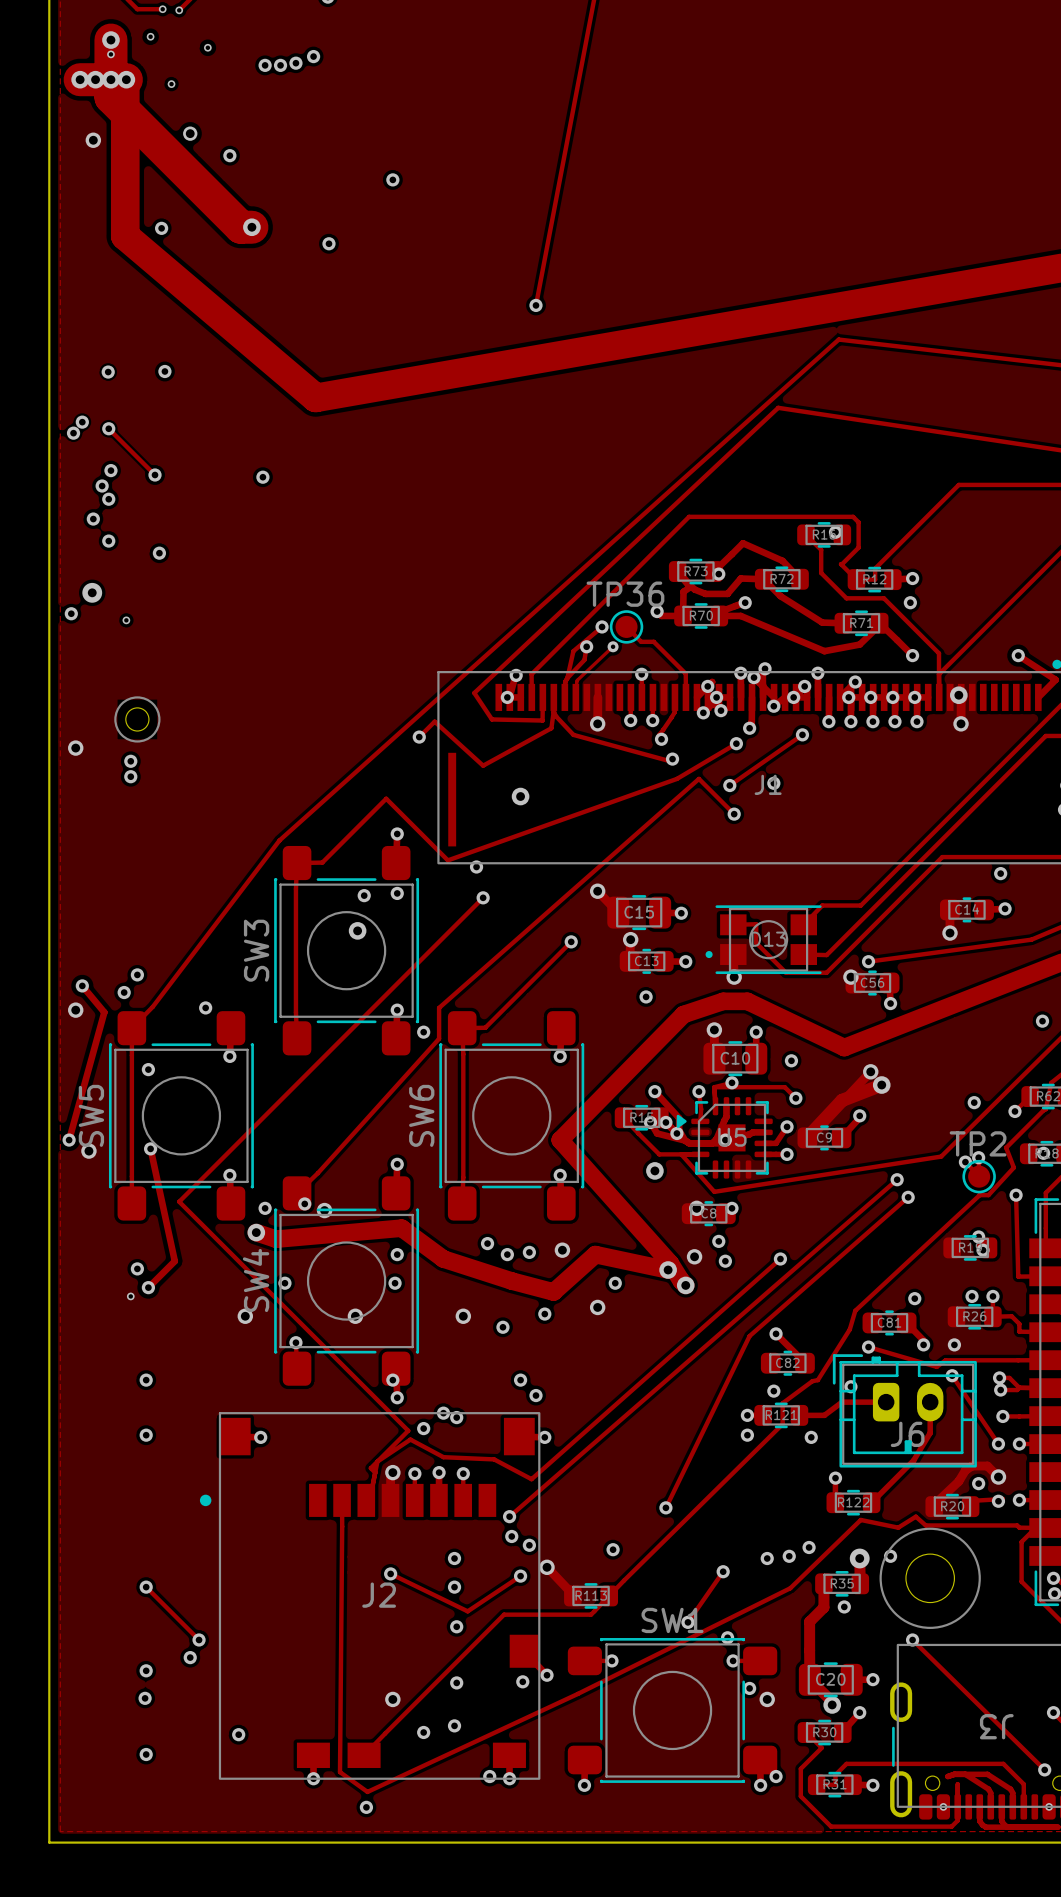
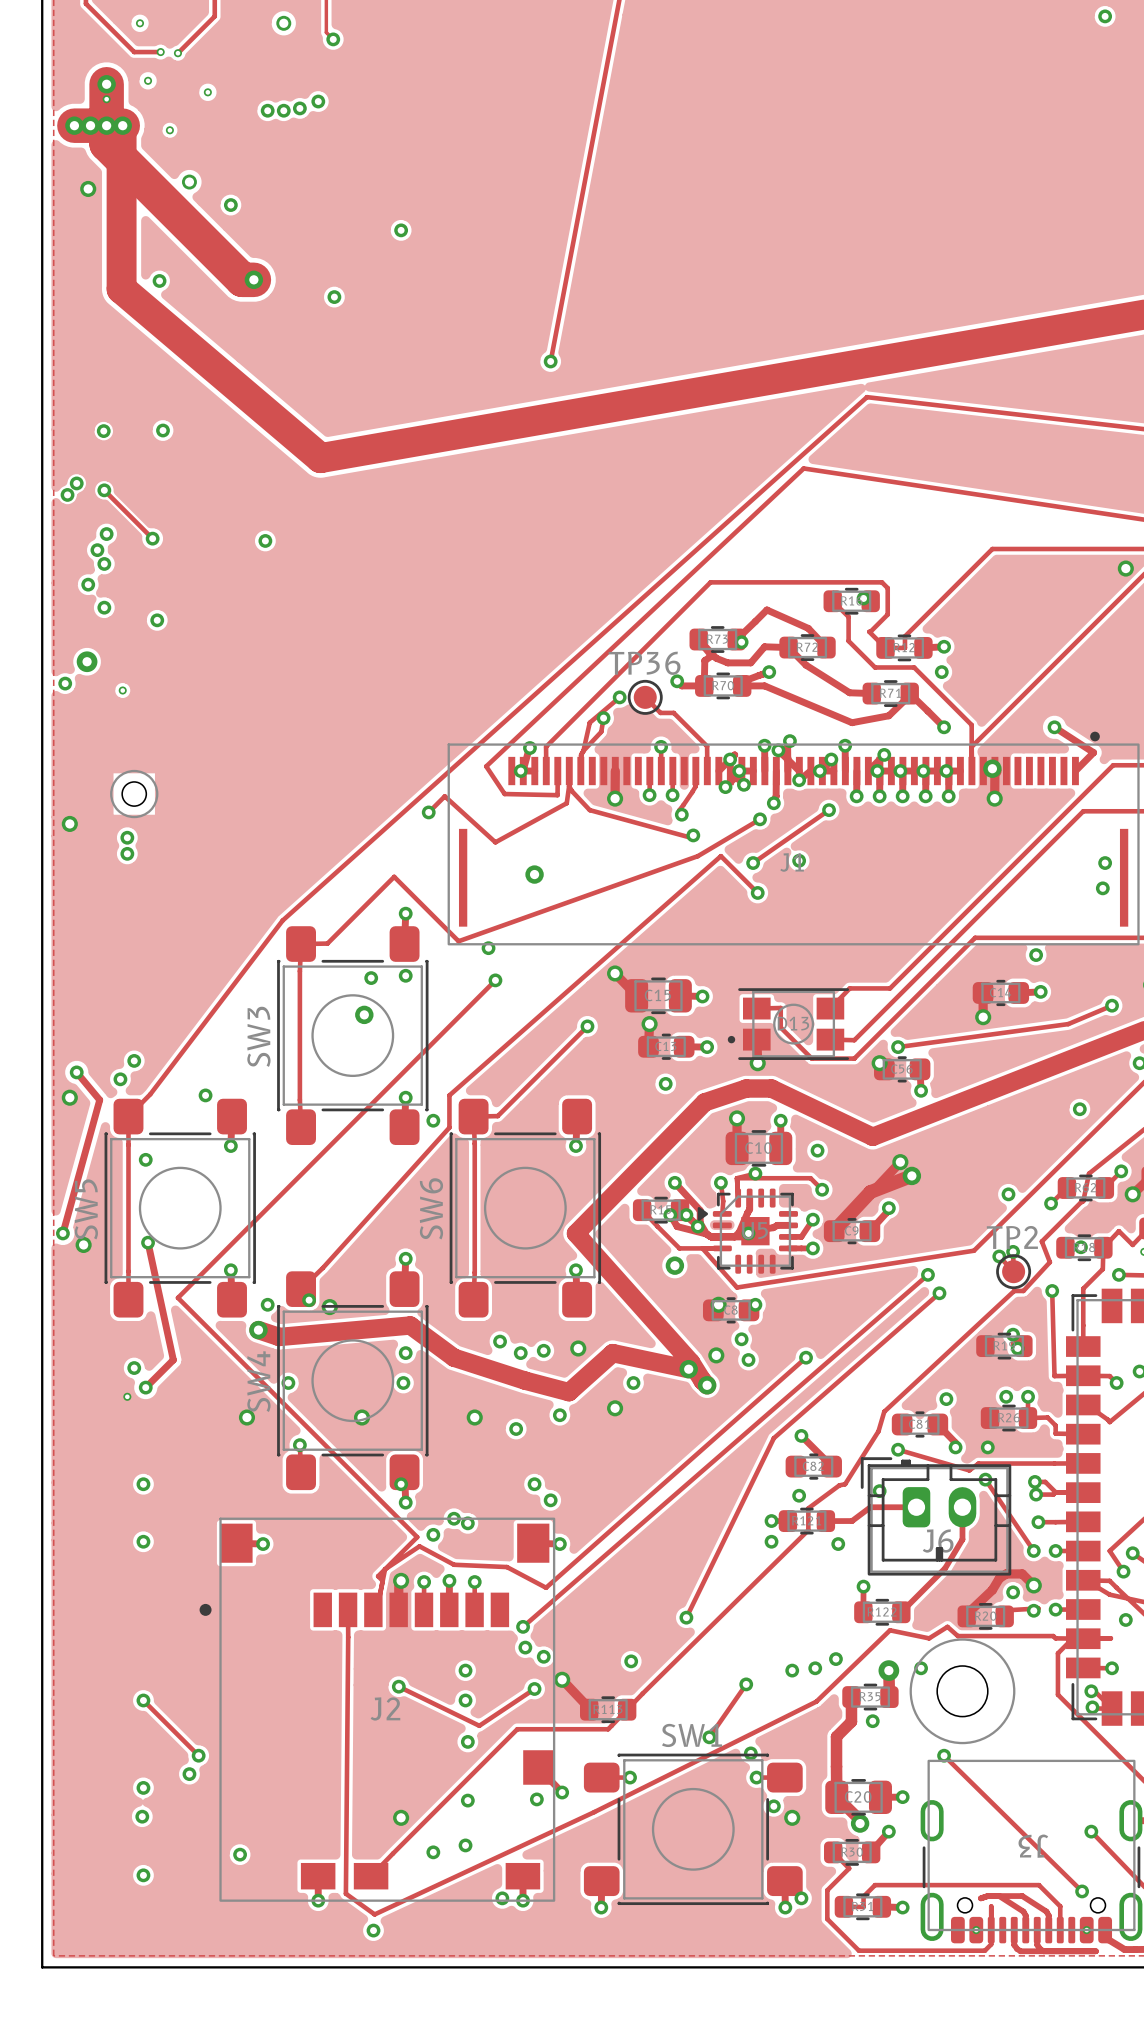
track: (613, 646) (615, 644) (577, 680) (576, 685) -> none
via: (613, 646) -> none

